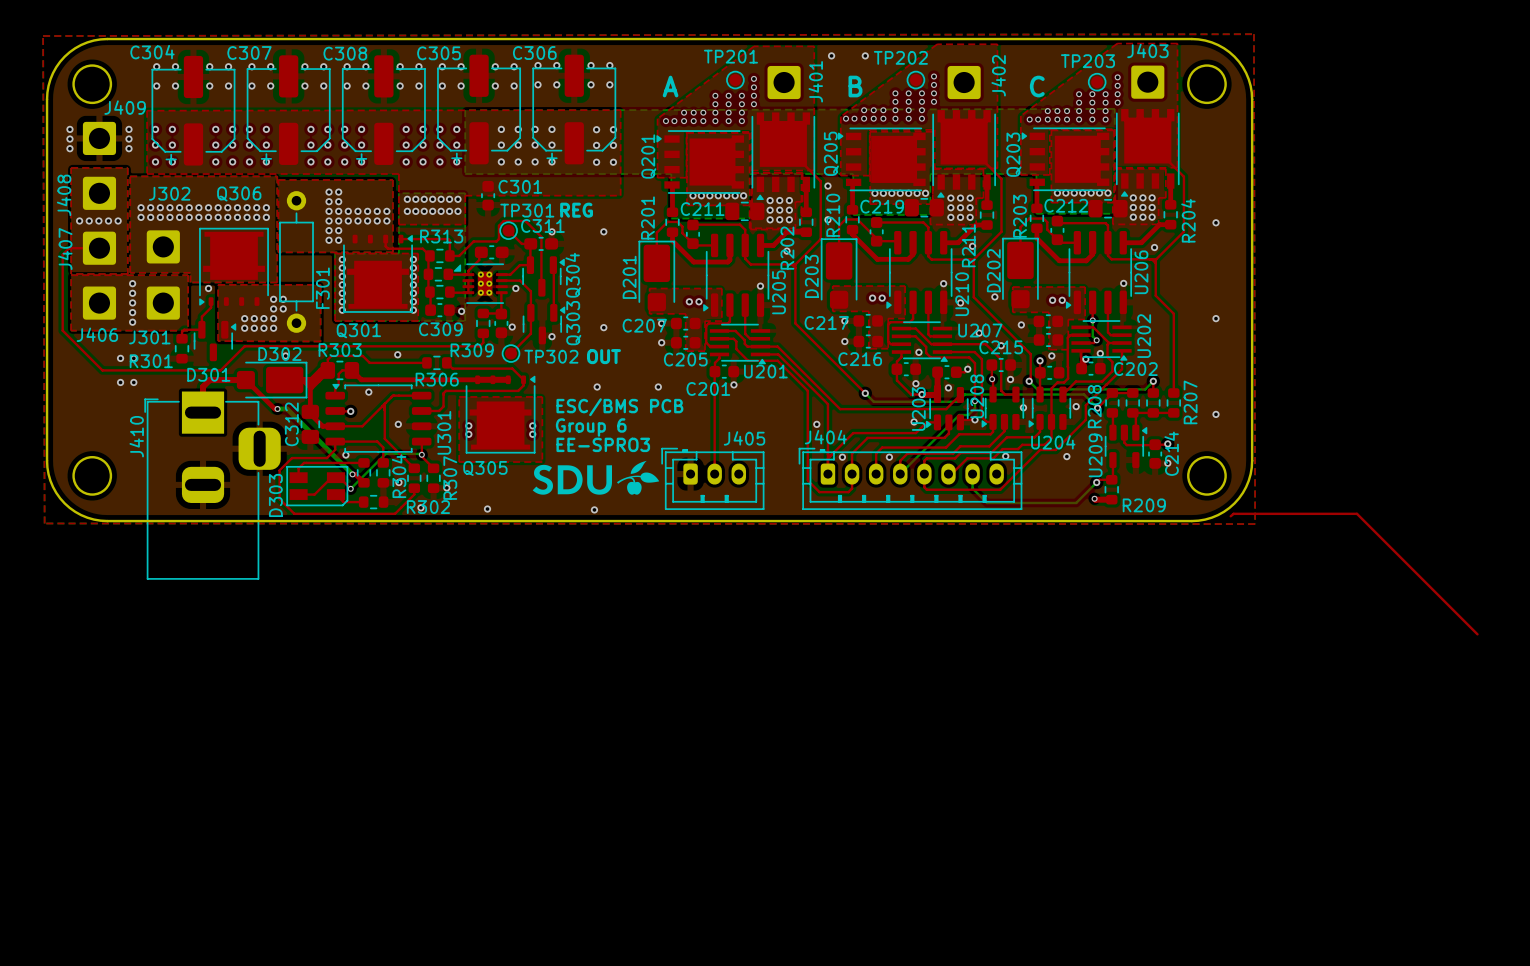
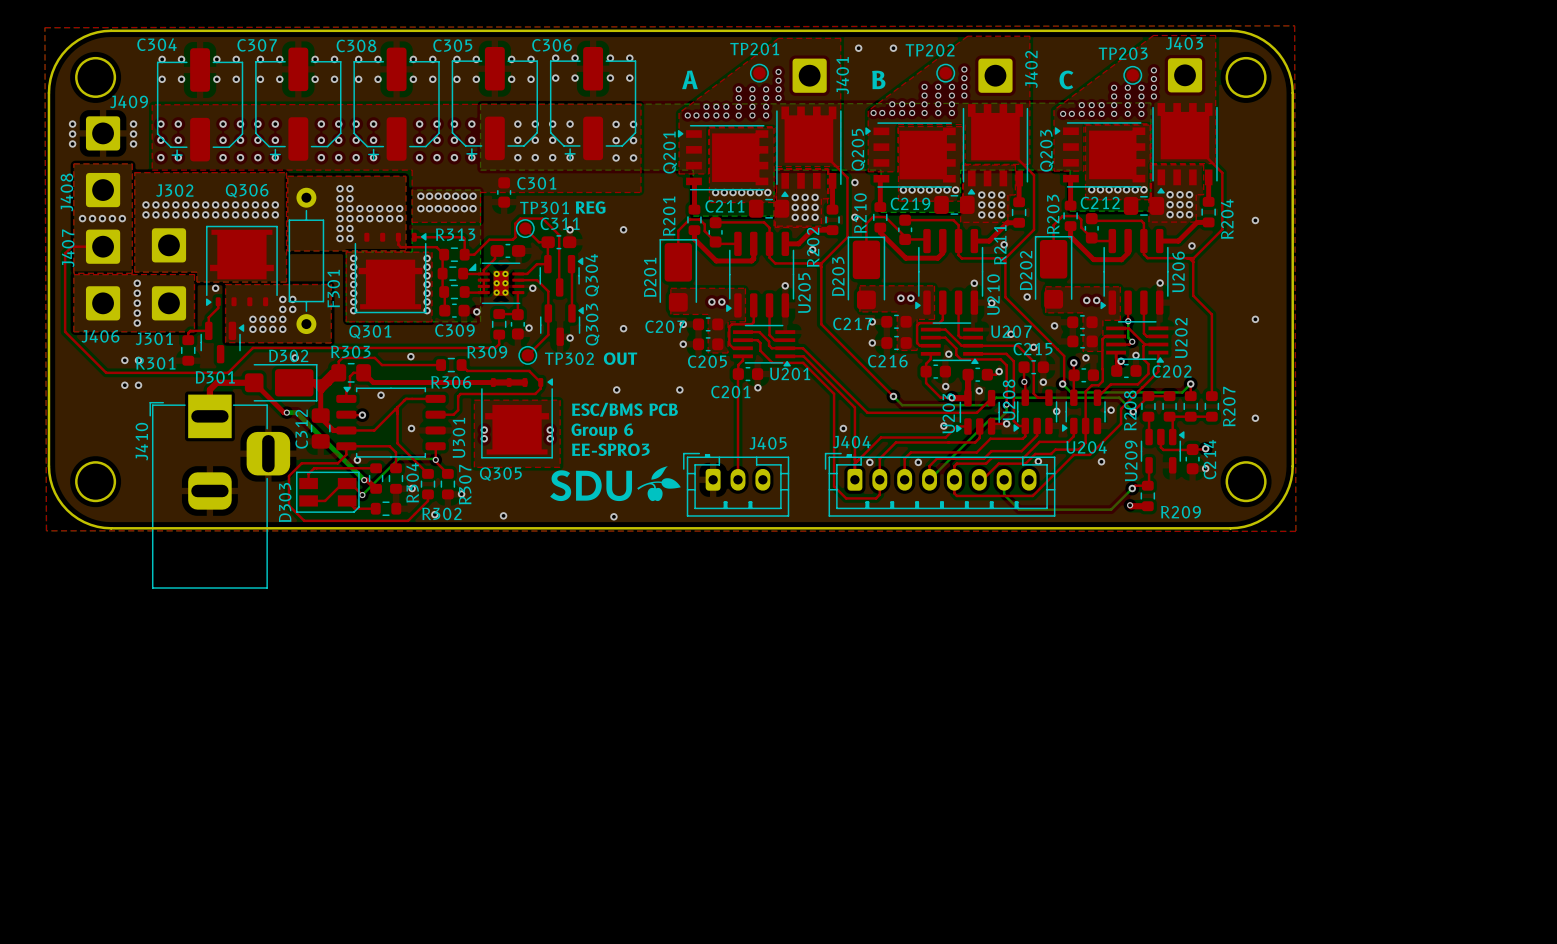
top track: (1230, 516) (1233, 513) (1356, 513) (1477, 634) -> none

